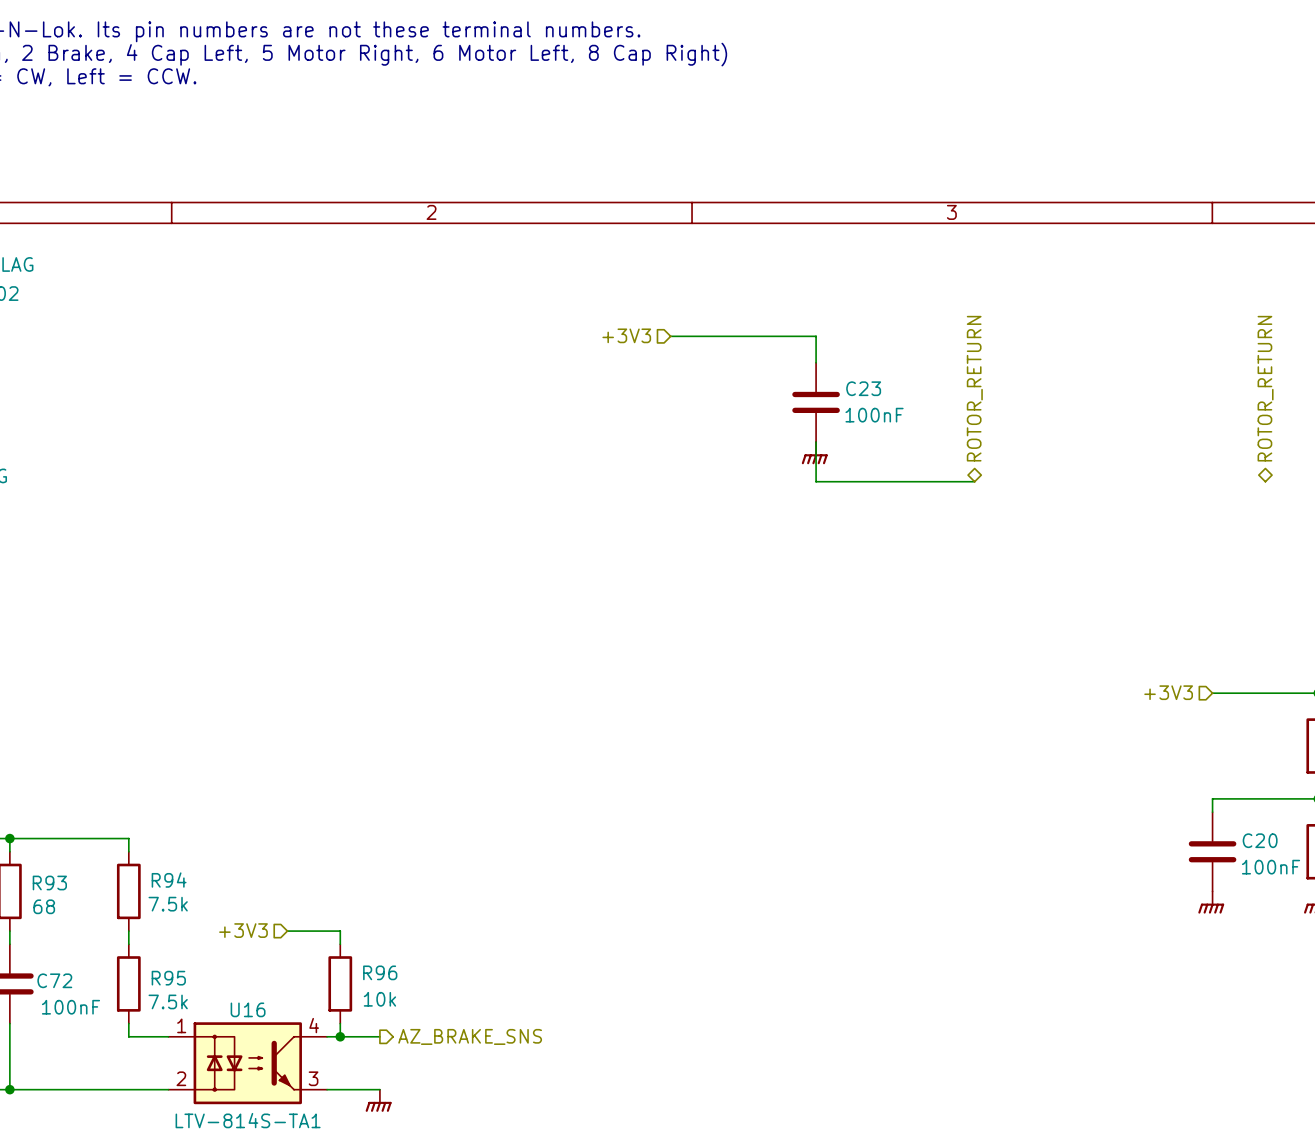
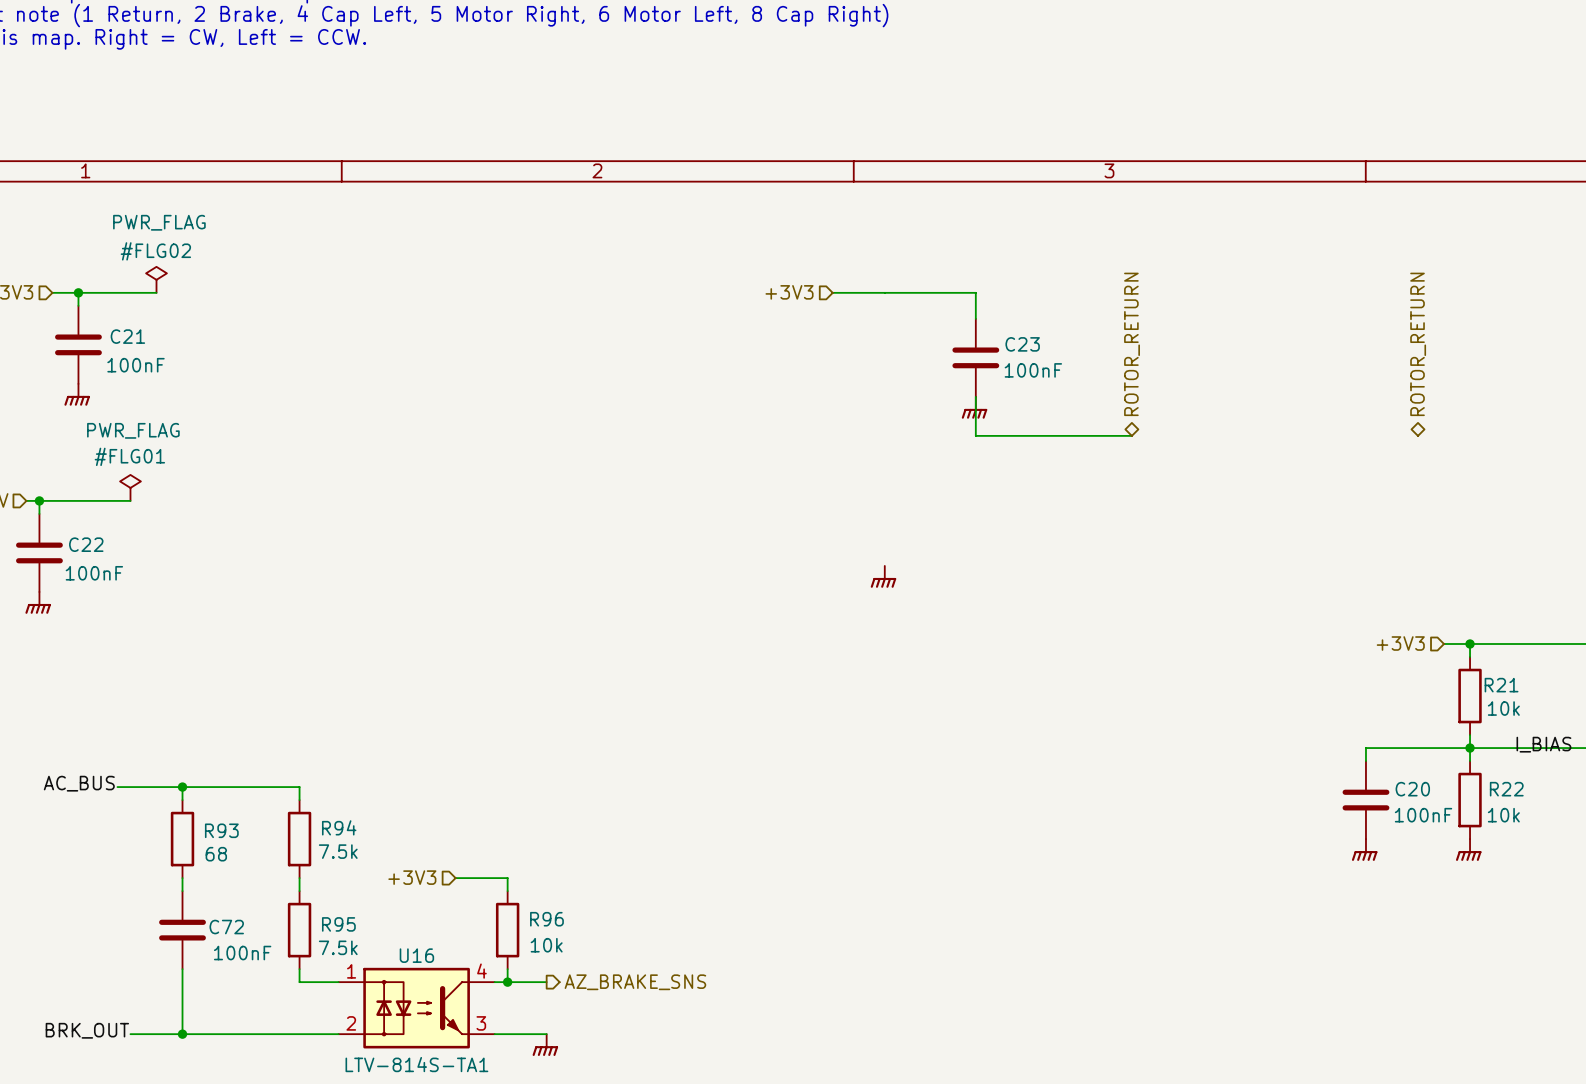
power symbol: none -> (883, 576)
hierarchical label position: +3V3 (1168, 692) -> +3V3 (1400, 643)
wire: (1212, 693) (1291, 693) -> none

